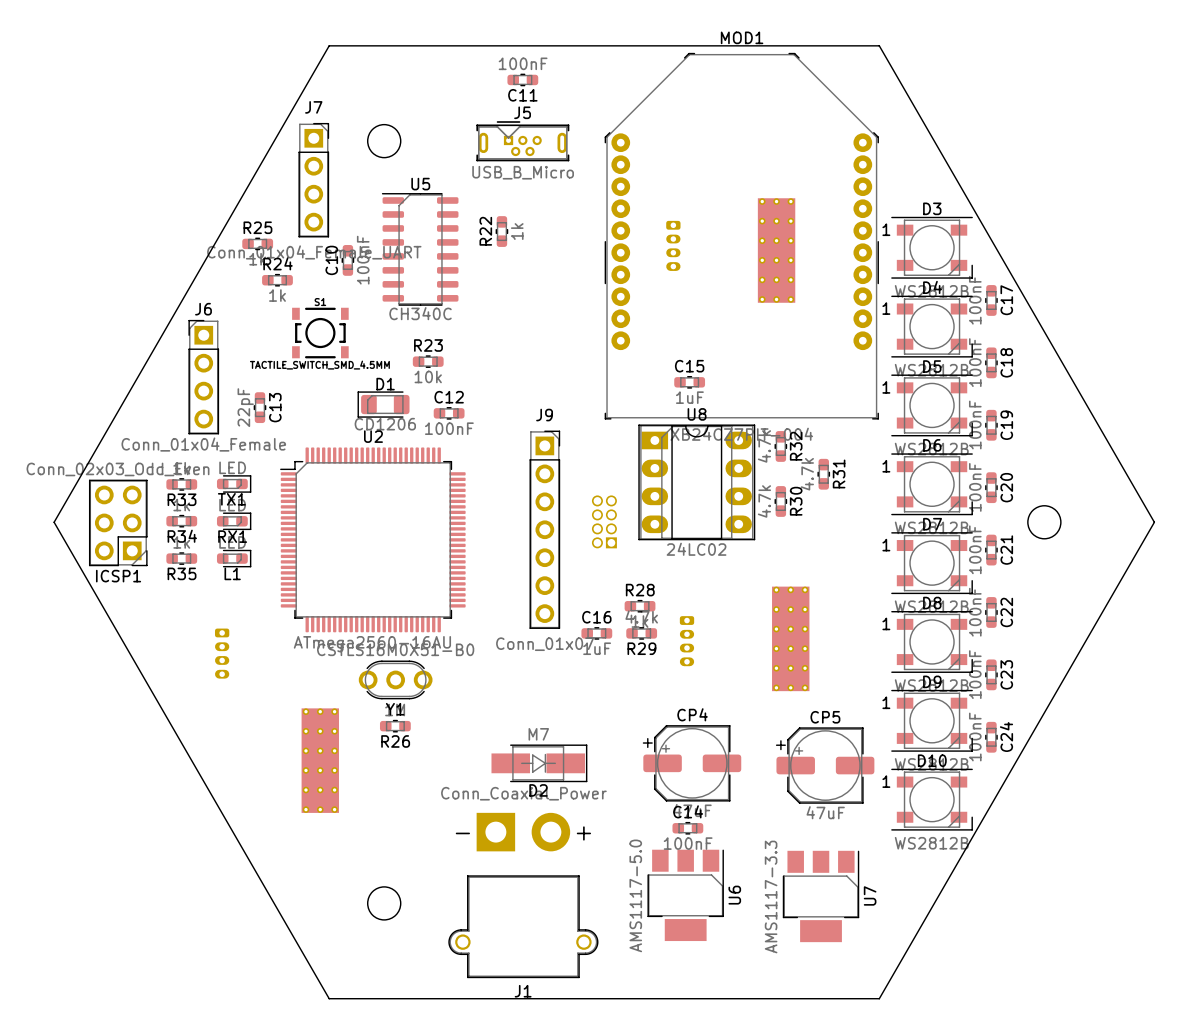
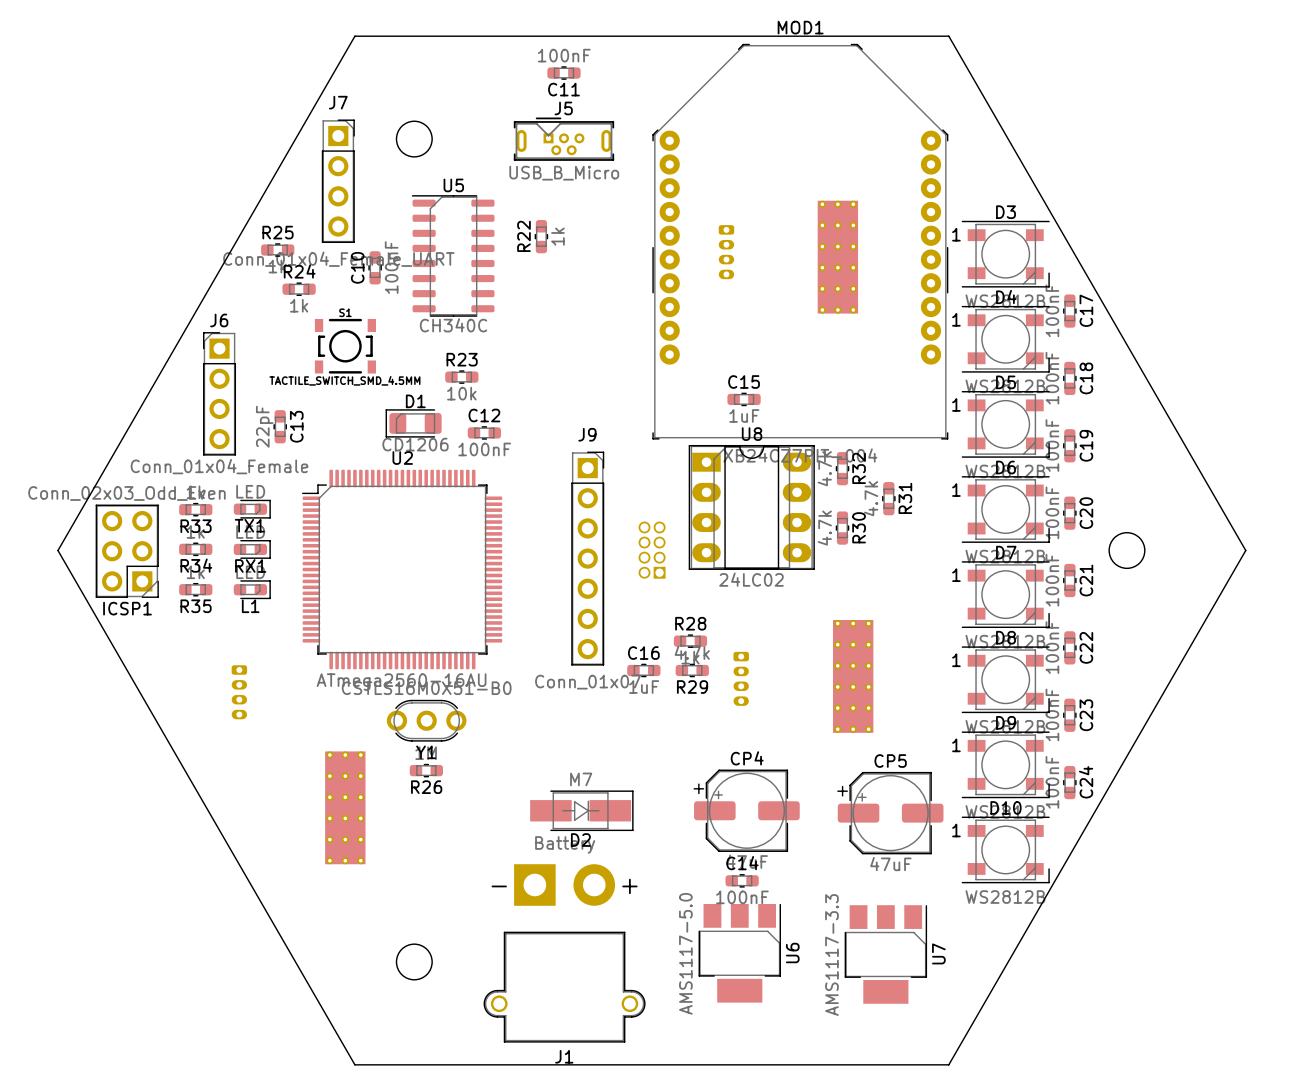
J1 value: Conn_Coaxial_Power (523, 793) -> Battery (565, 844)

